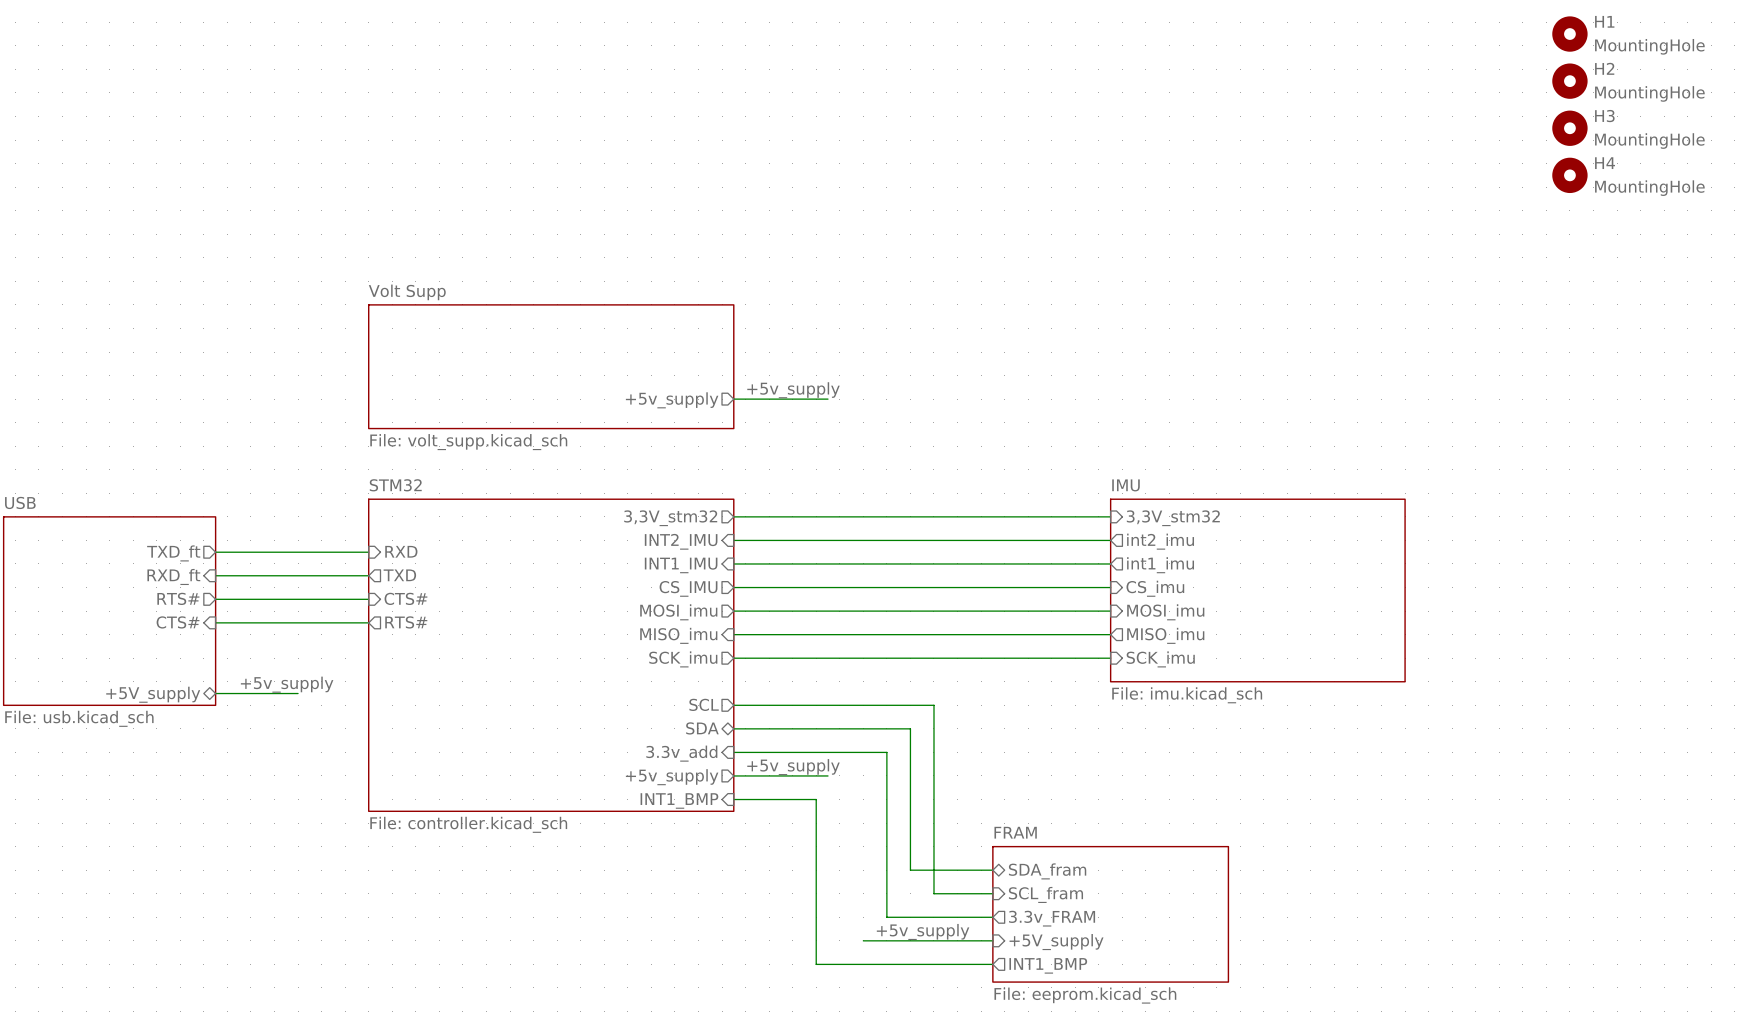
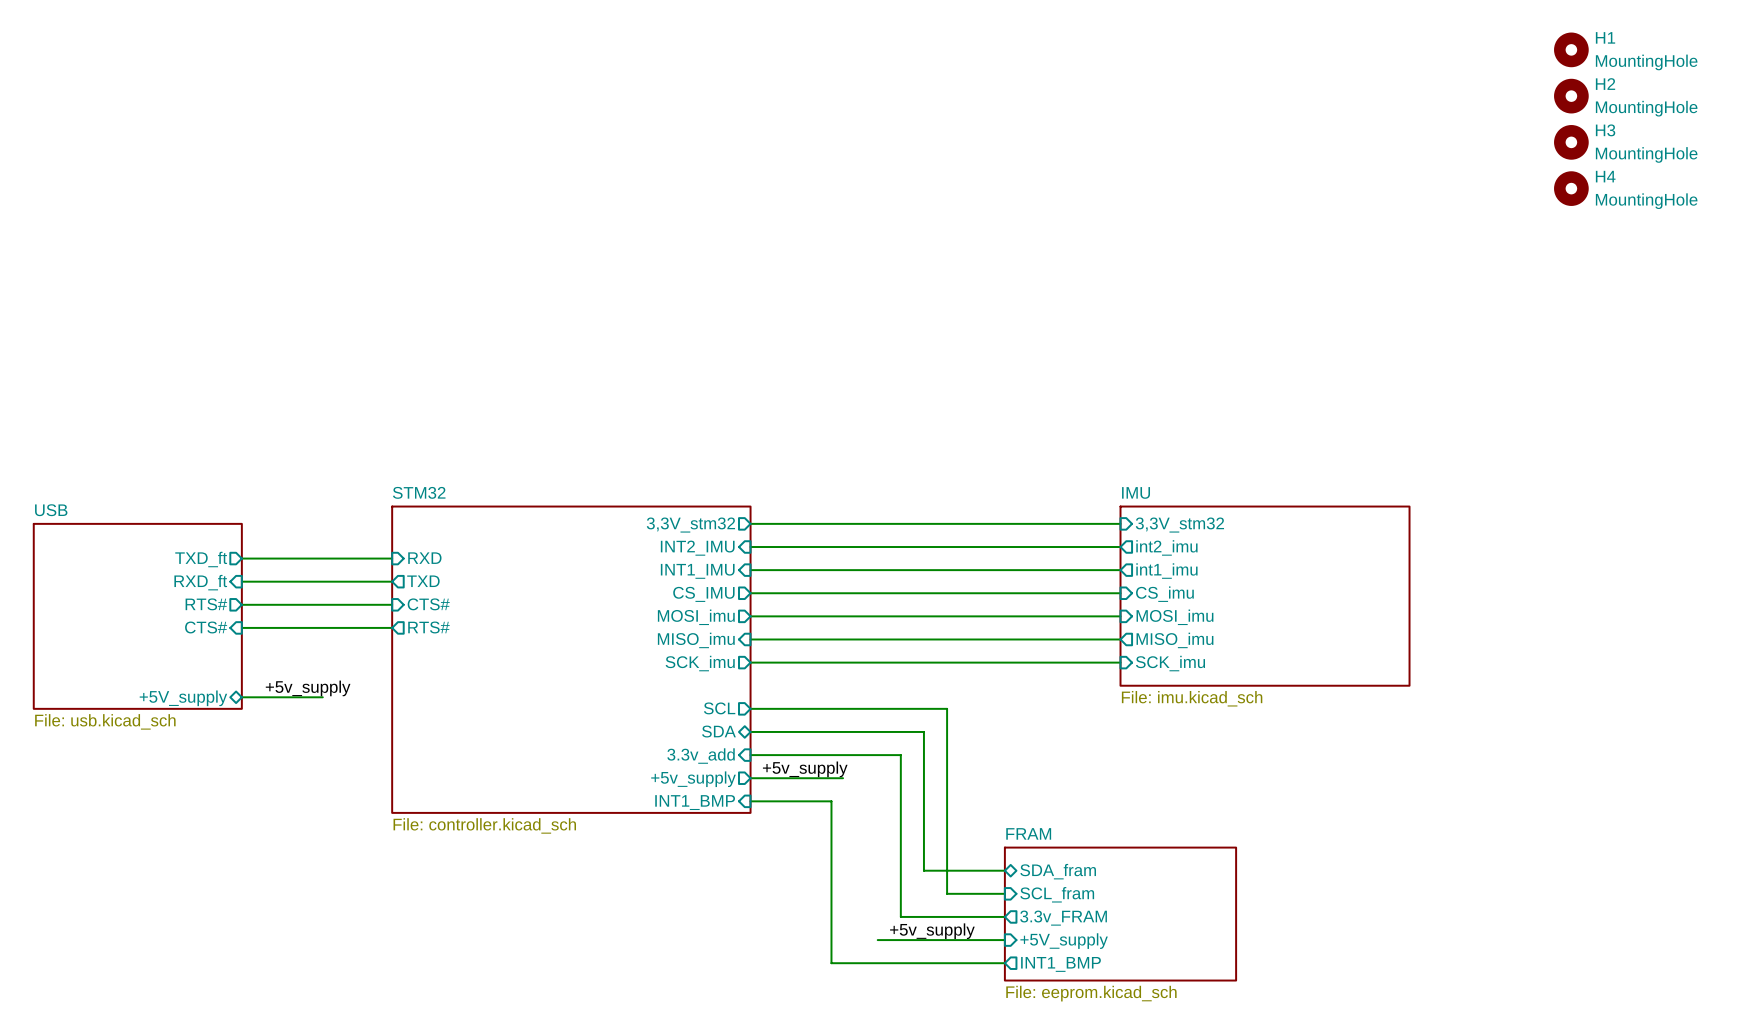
sheet Volt Supp: File: volt_supp.kicad_sch (551, 366) -> none
label: +5v_supply (793, 390) -> none
wire: (733, 399) (828, 399) -> none
sheet pin: +5v_supply (672, 400) -> none

